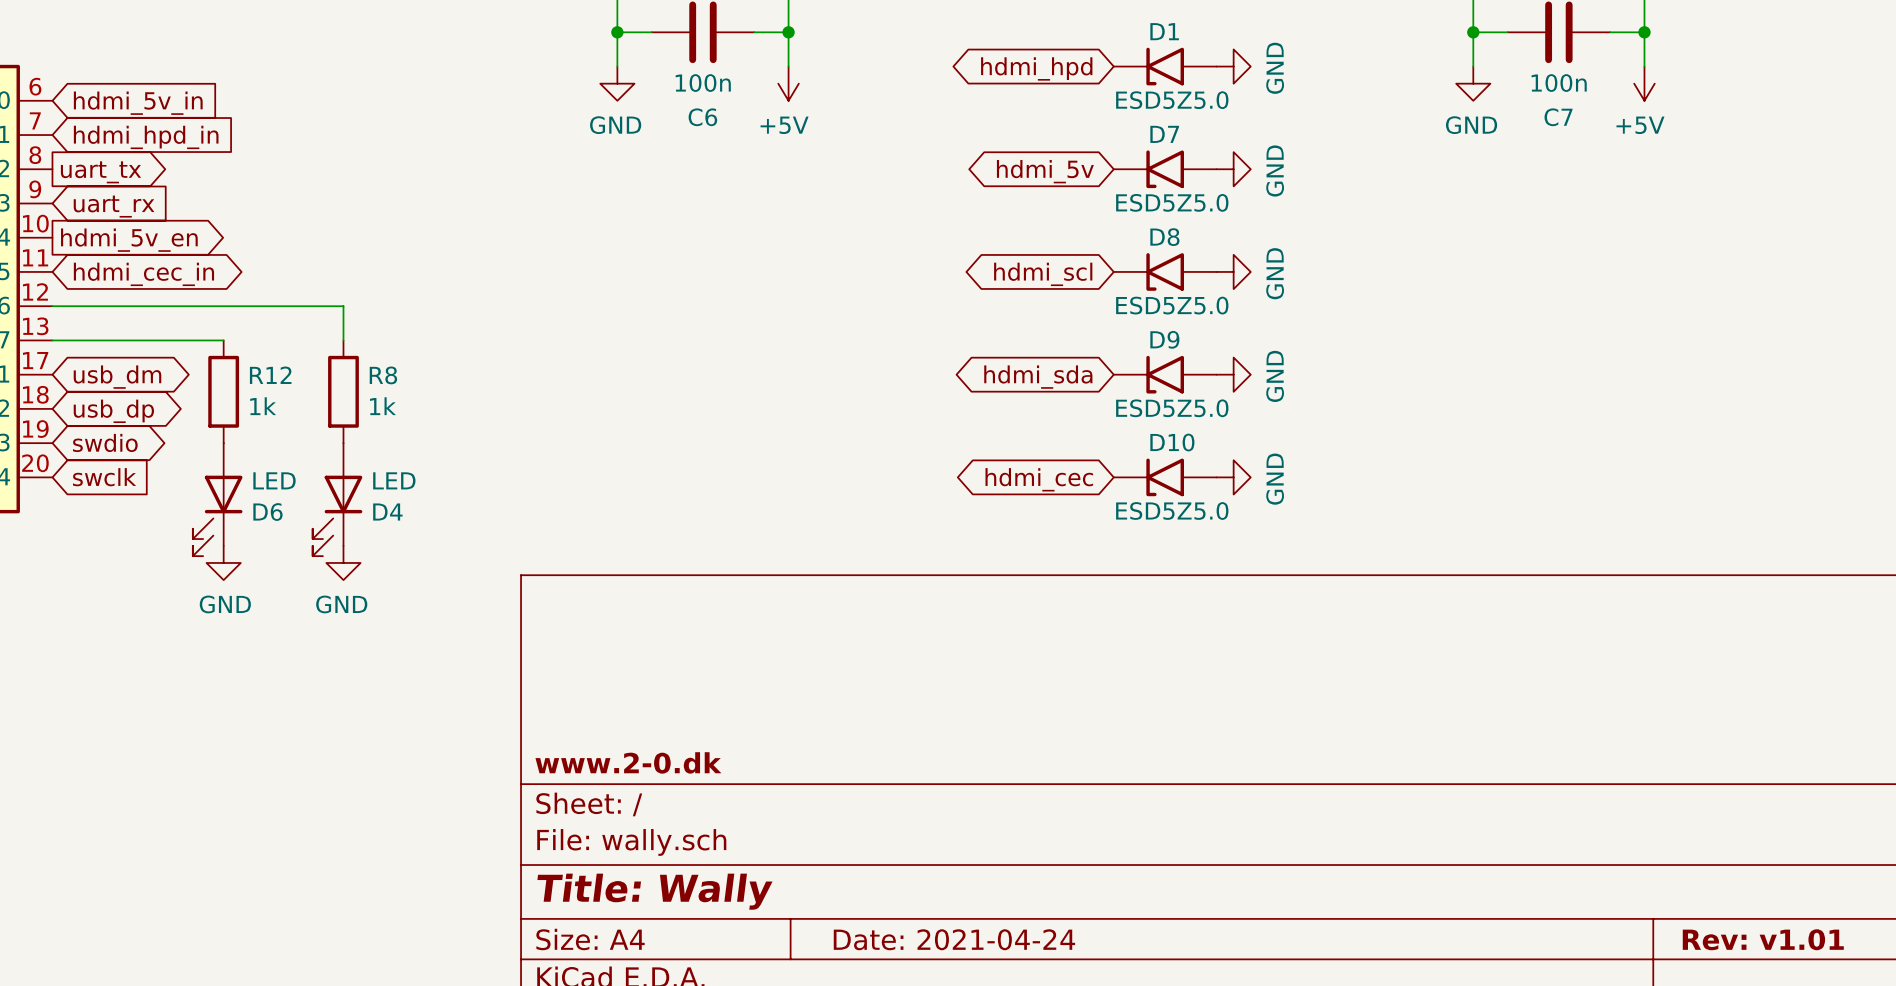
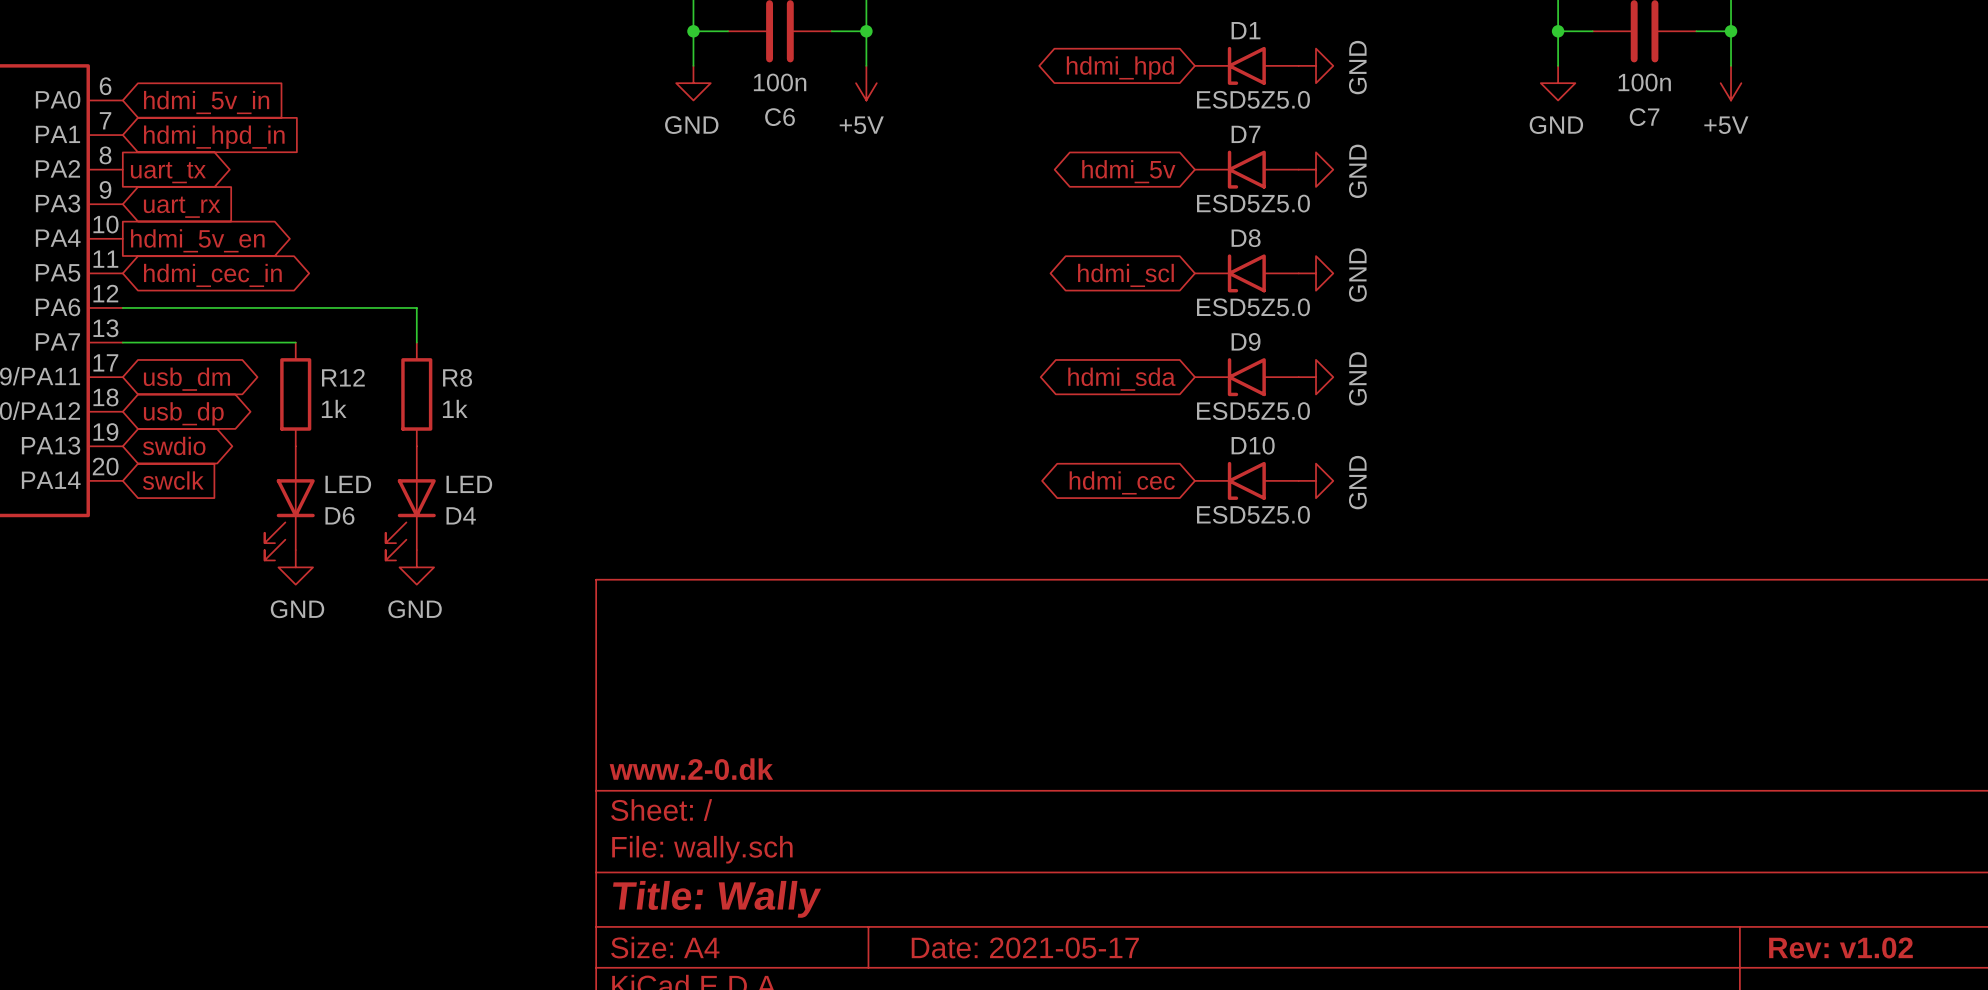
title block: Date: 2021-04-24 (954, 939) -> Date: 2021-05-17 (1025, 947)
title block: Rev: v1.01 (1763, 939) -> Rev: v1.02 (1840, 947)

